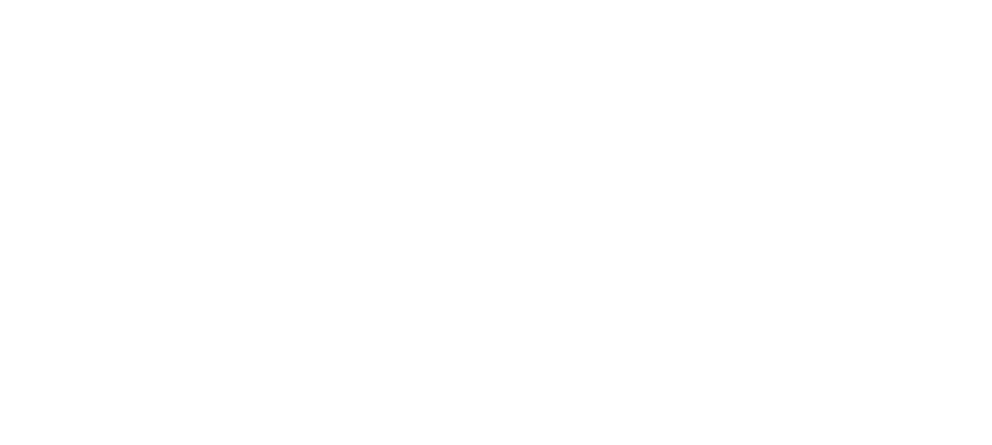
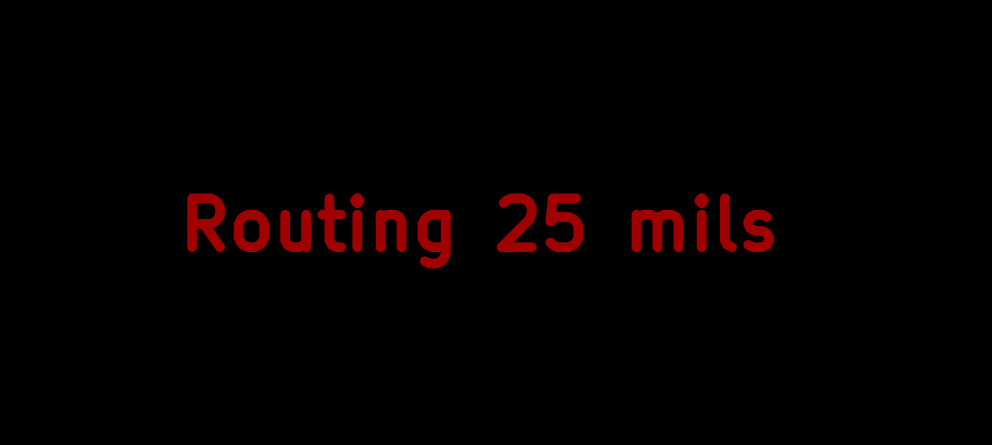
text: none -> Routing 25 mils (480, 230)

